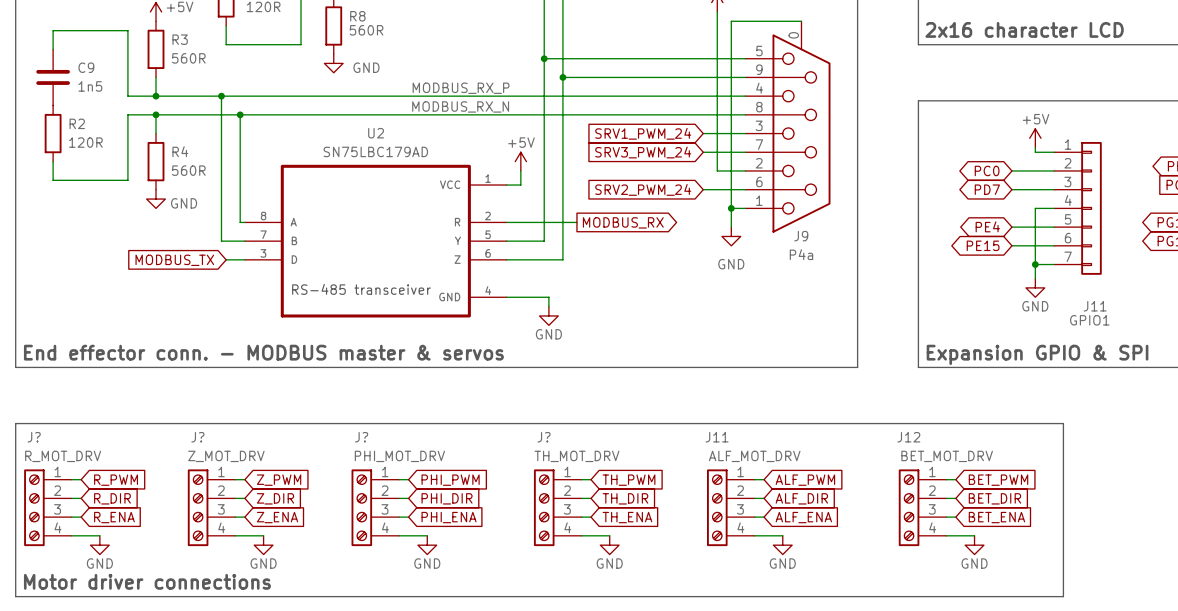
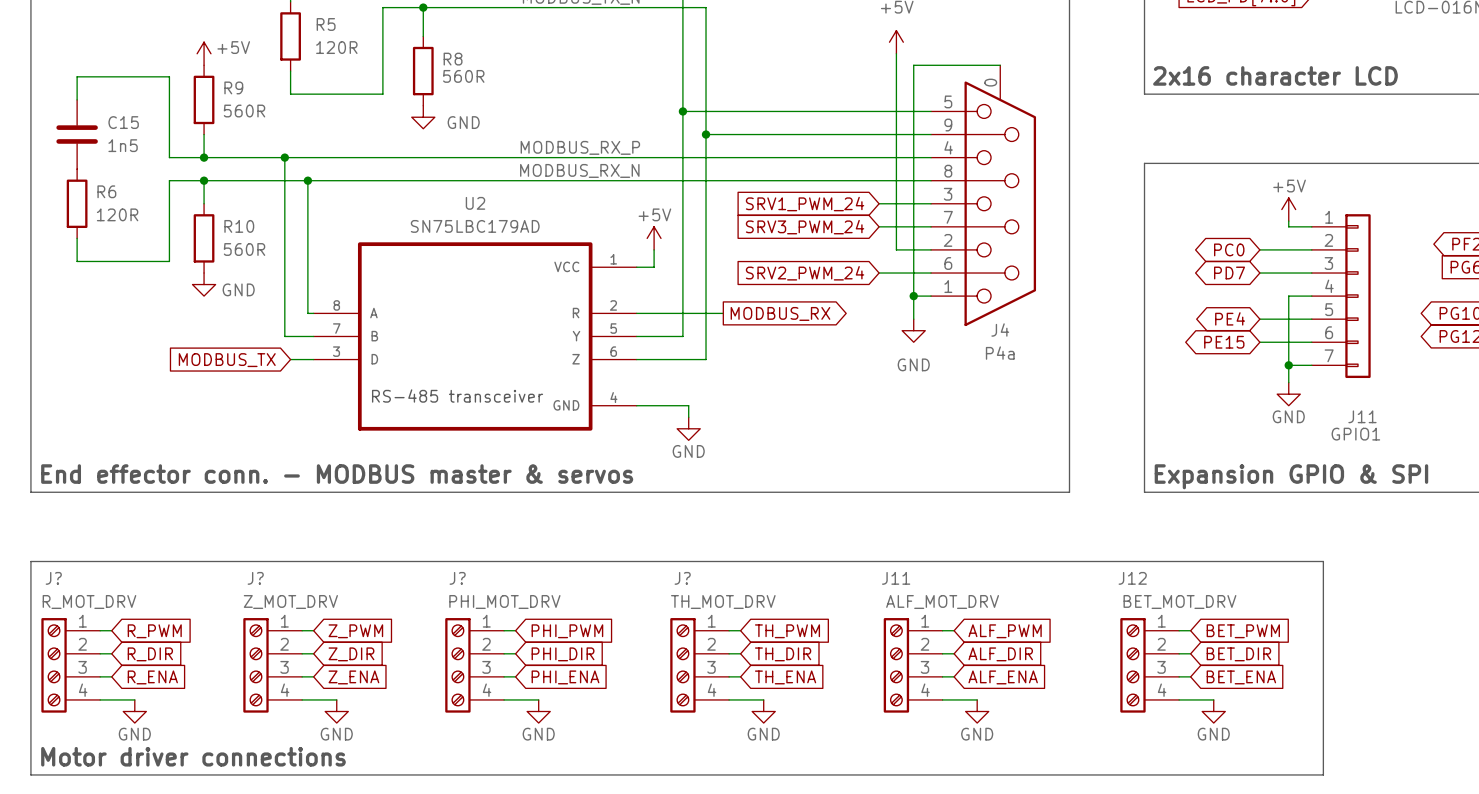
R3 name: R3 (180, 39) -> R9 (233, 87)
C9 name: C9 (86, 67) -> C15 (123, 122)
R2 name: R2 (77, 123) -> R6 (106, 191)
R4 name: R4 (180, 151) -> R10 (239, 226)
J9 name: J9 (801, 236) -> J4 (1000, 330)

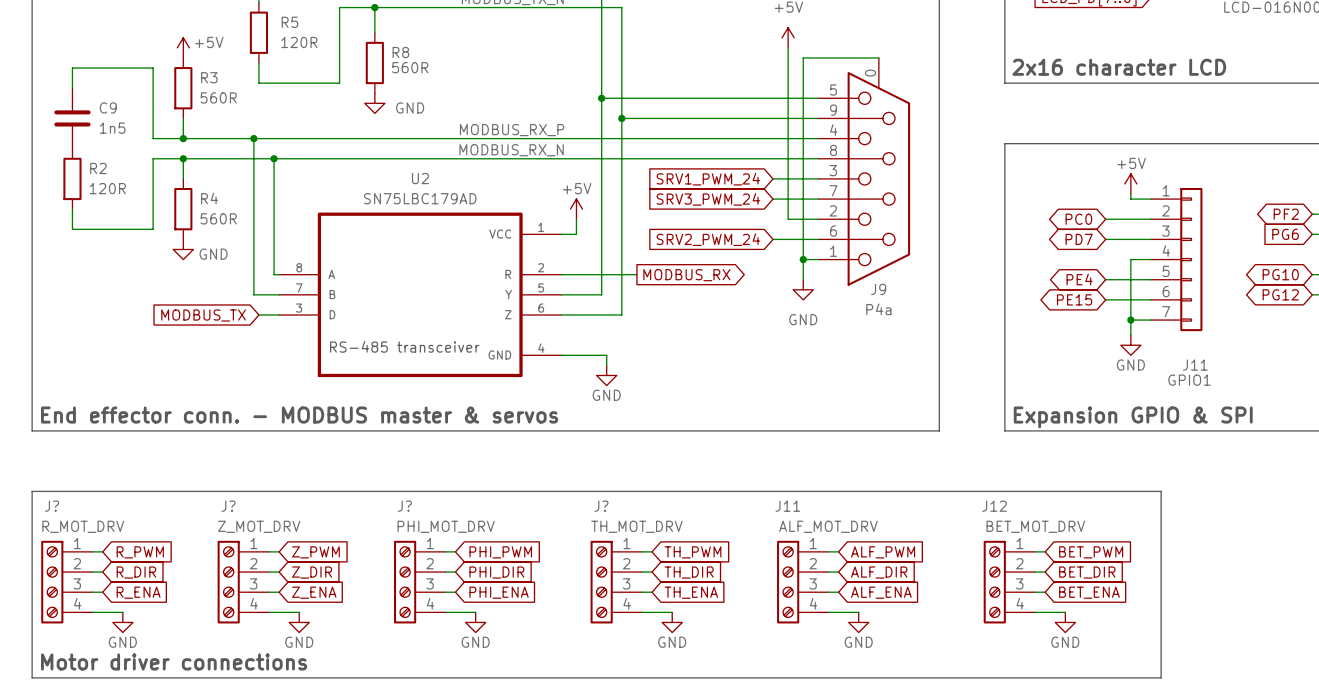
R9 name: R9 (233, 87) -> R3 (209, 77)
C15 name: C15 (123, 122) -> C9 (108, 107)
R6 name: R6 (106, 191) -> R2 (98, 168)
R10 name: R10 (239, 226) -> R4 (209, 198)
J4 name: J4 (1000, 330) -> J9 (878, 289)

